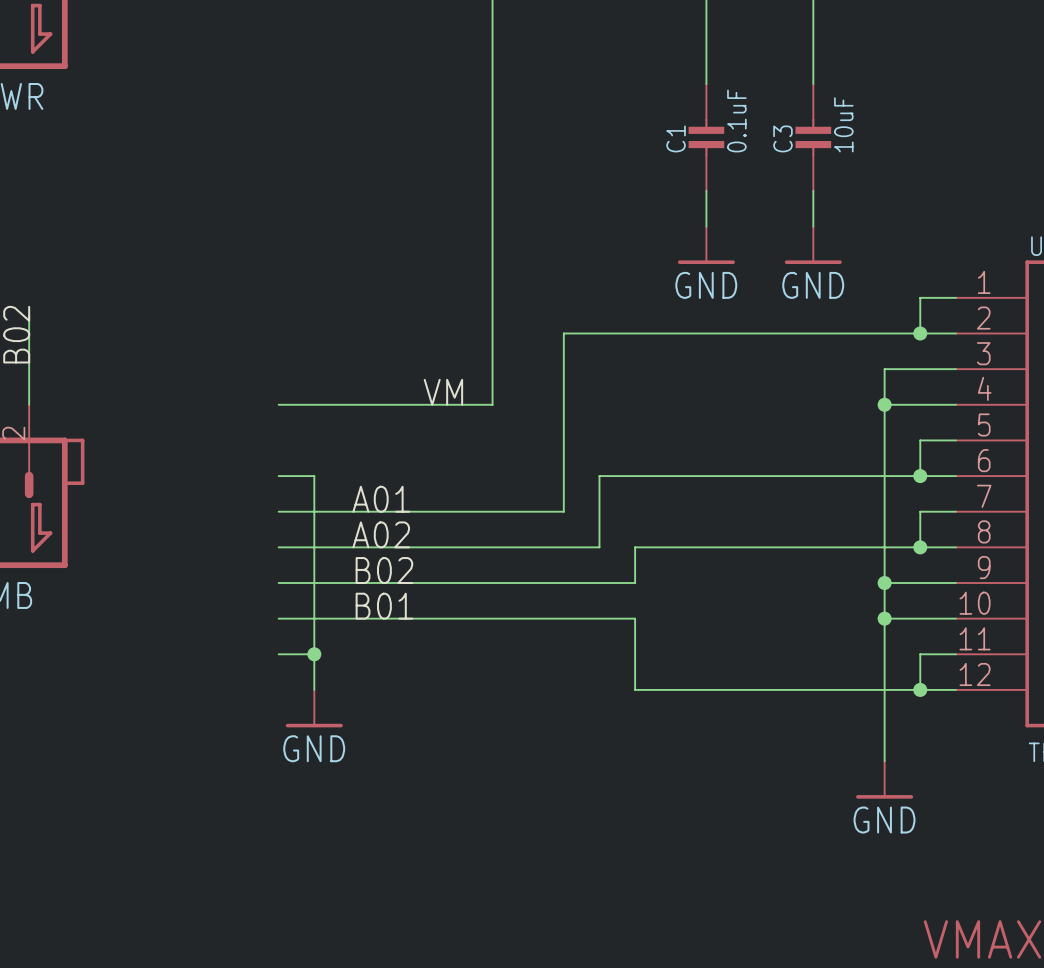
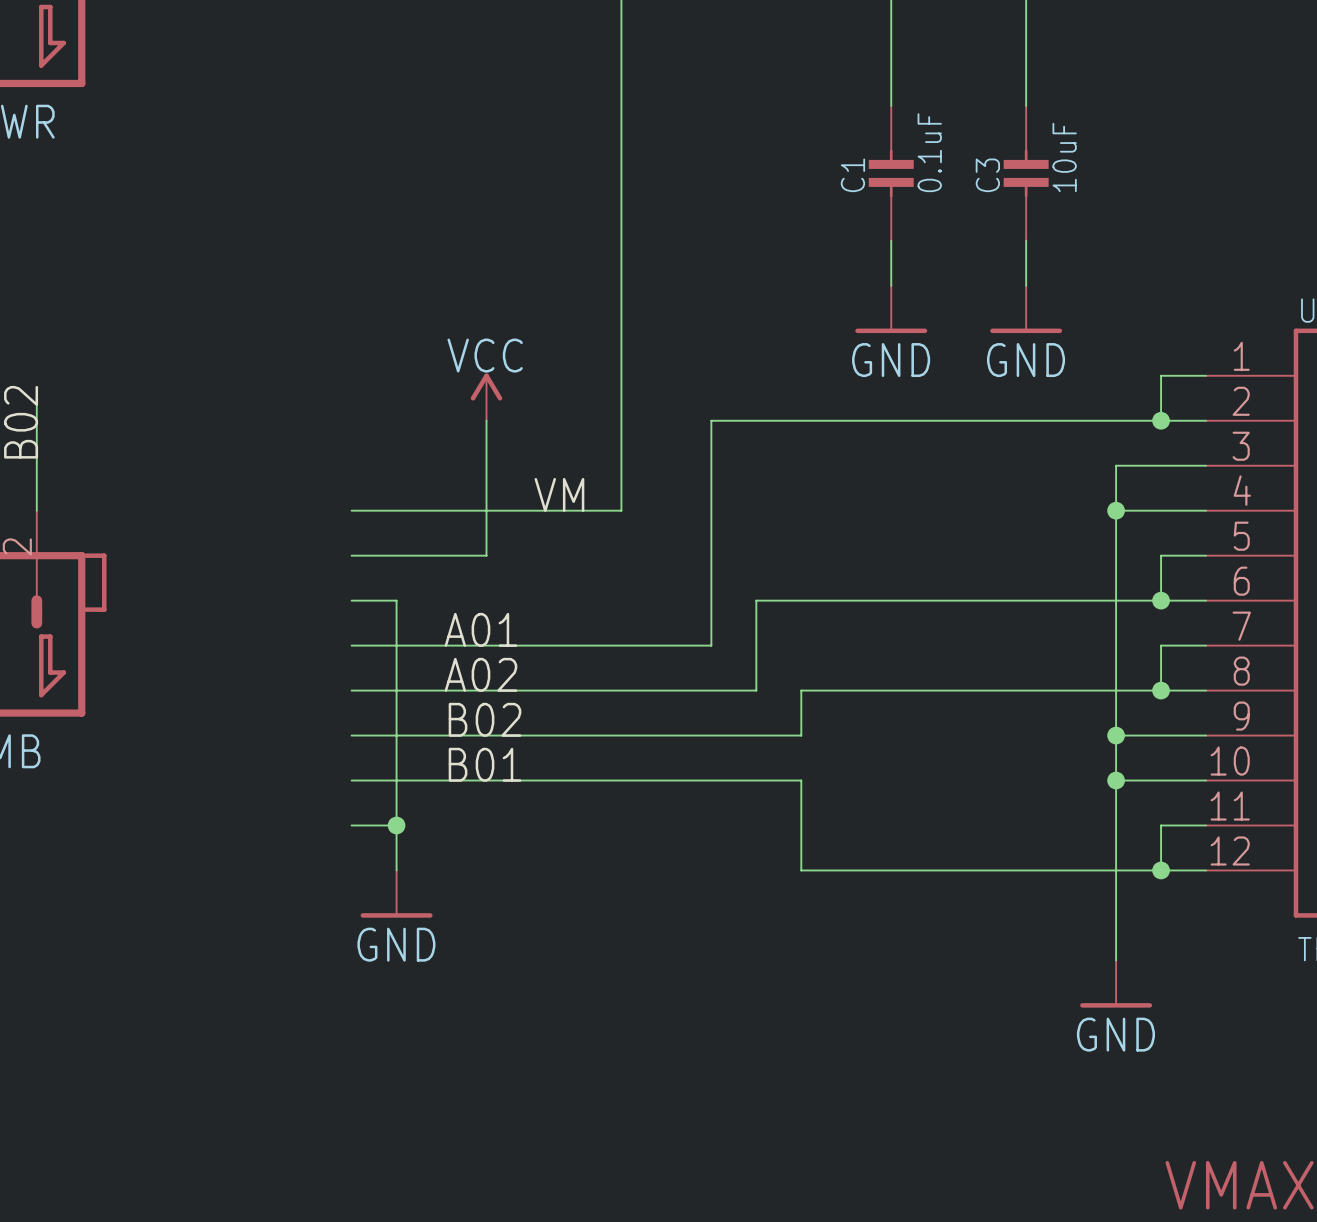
power symbol: none -> VCC (486, 397)
wire: none -> (486, 420) (486, 555) (351, 555)

